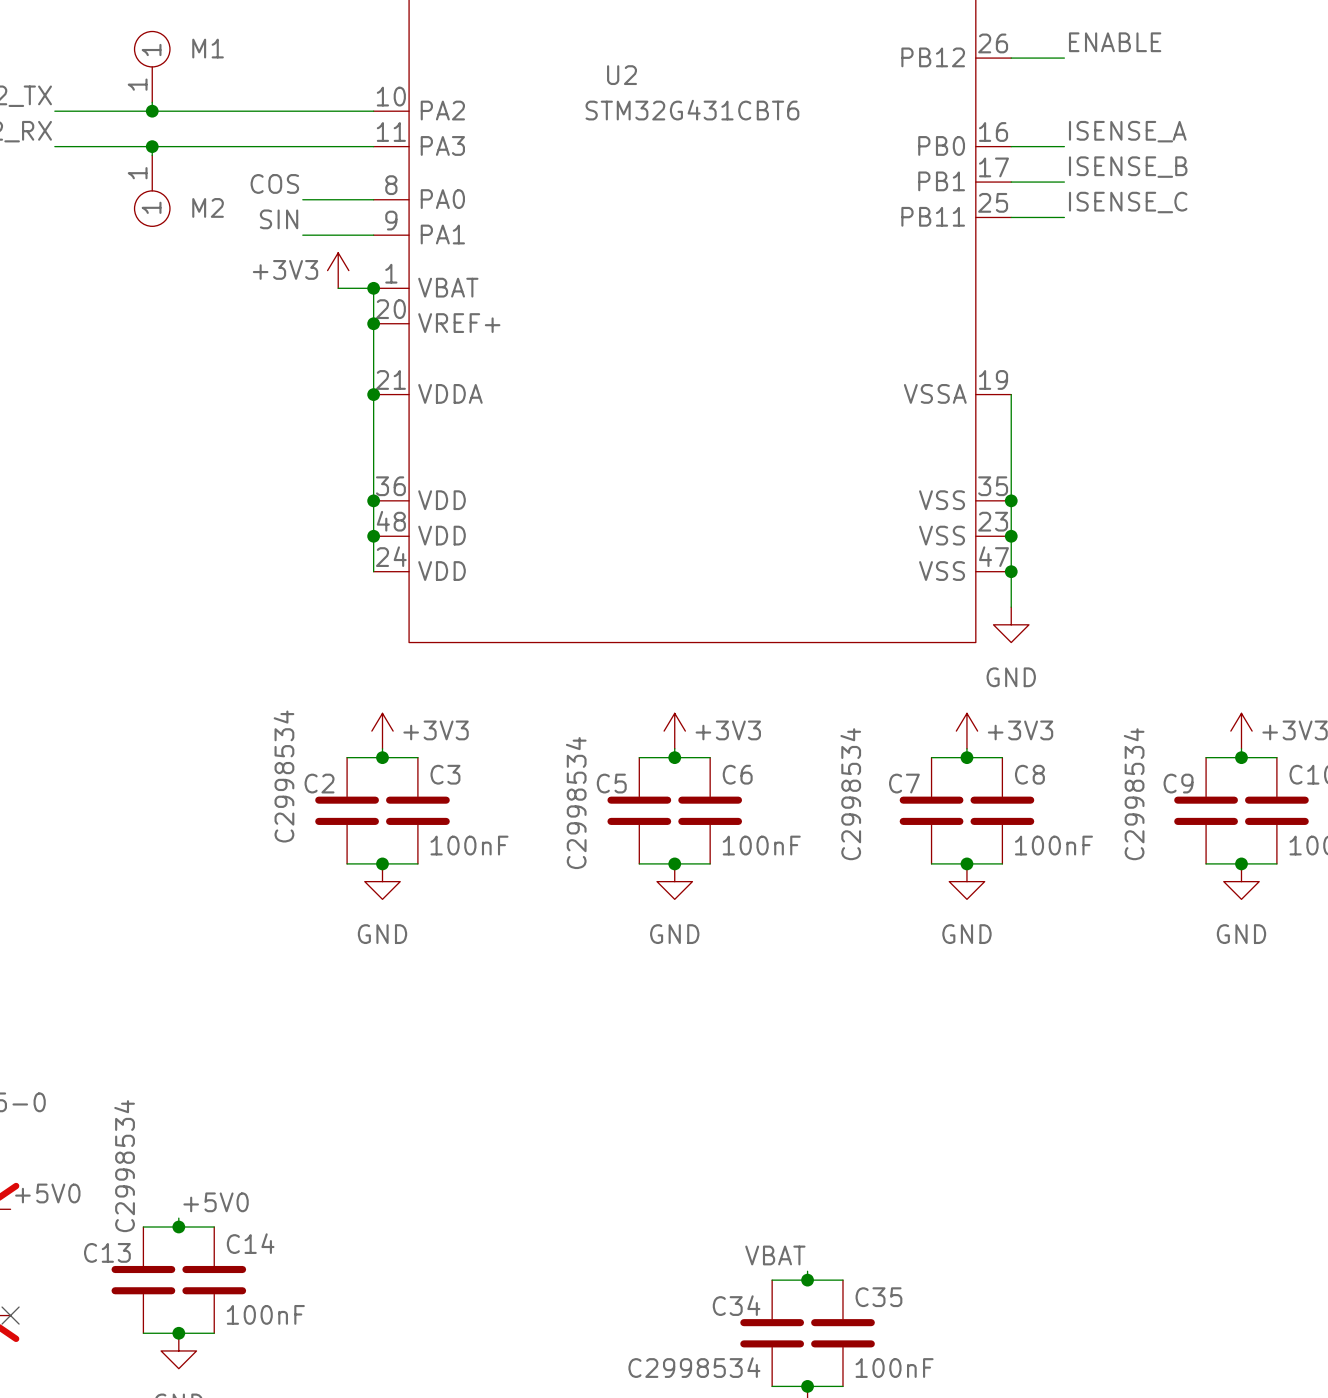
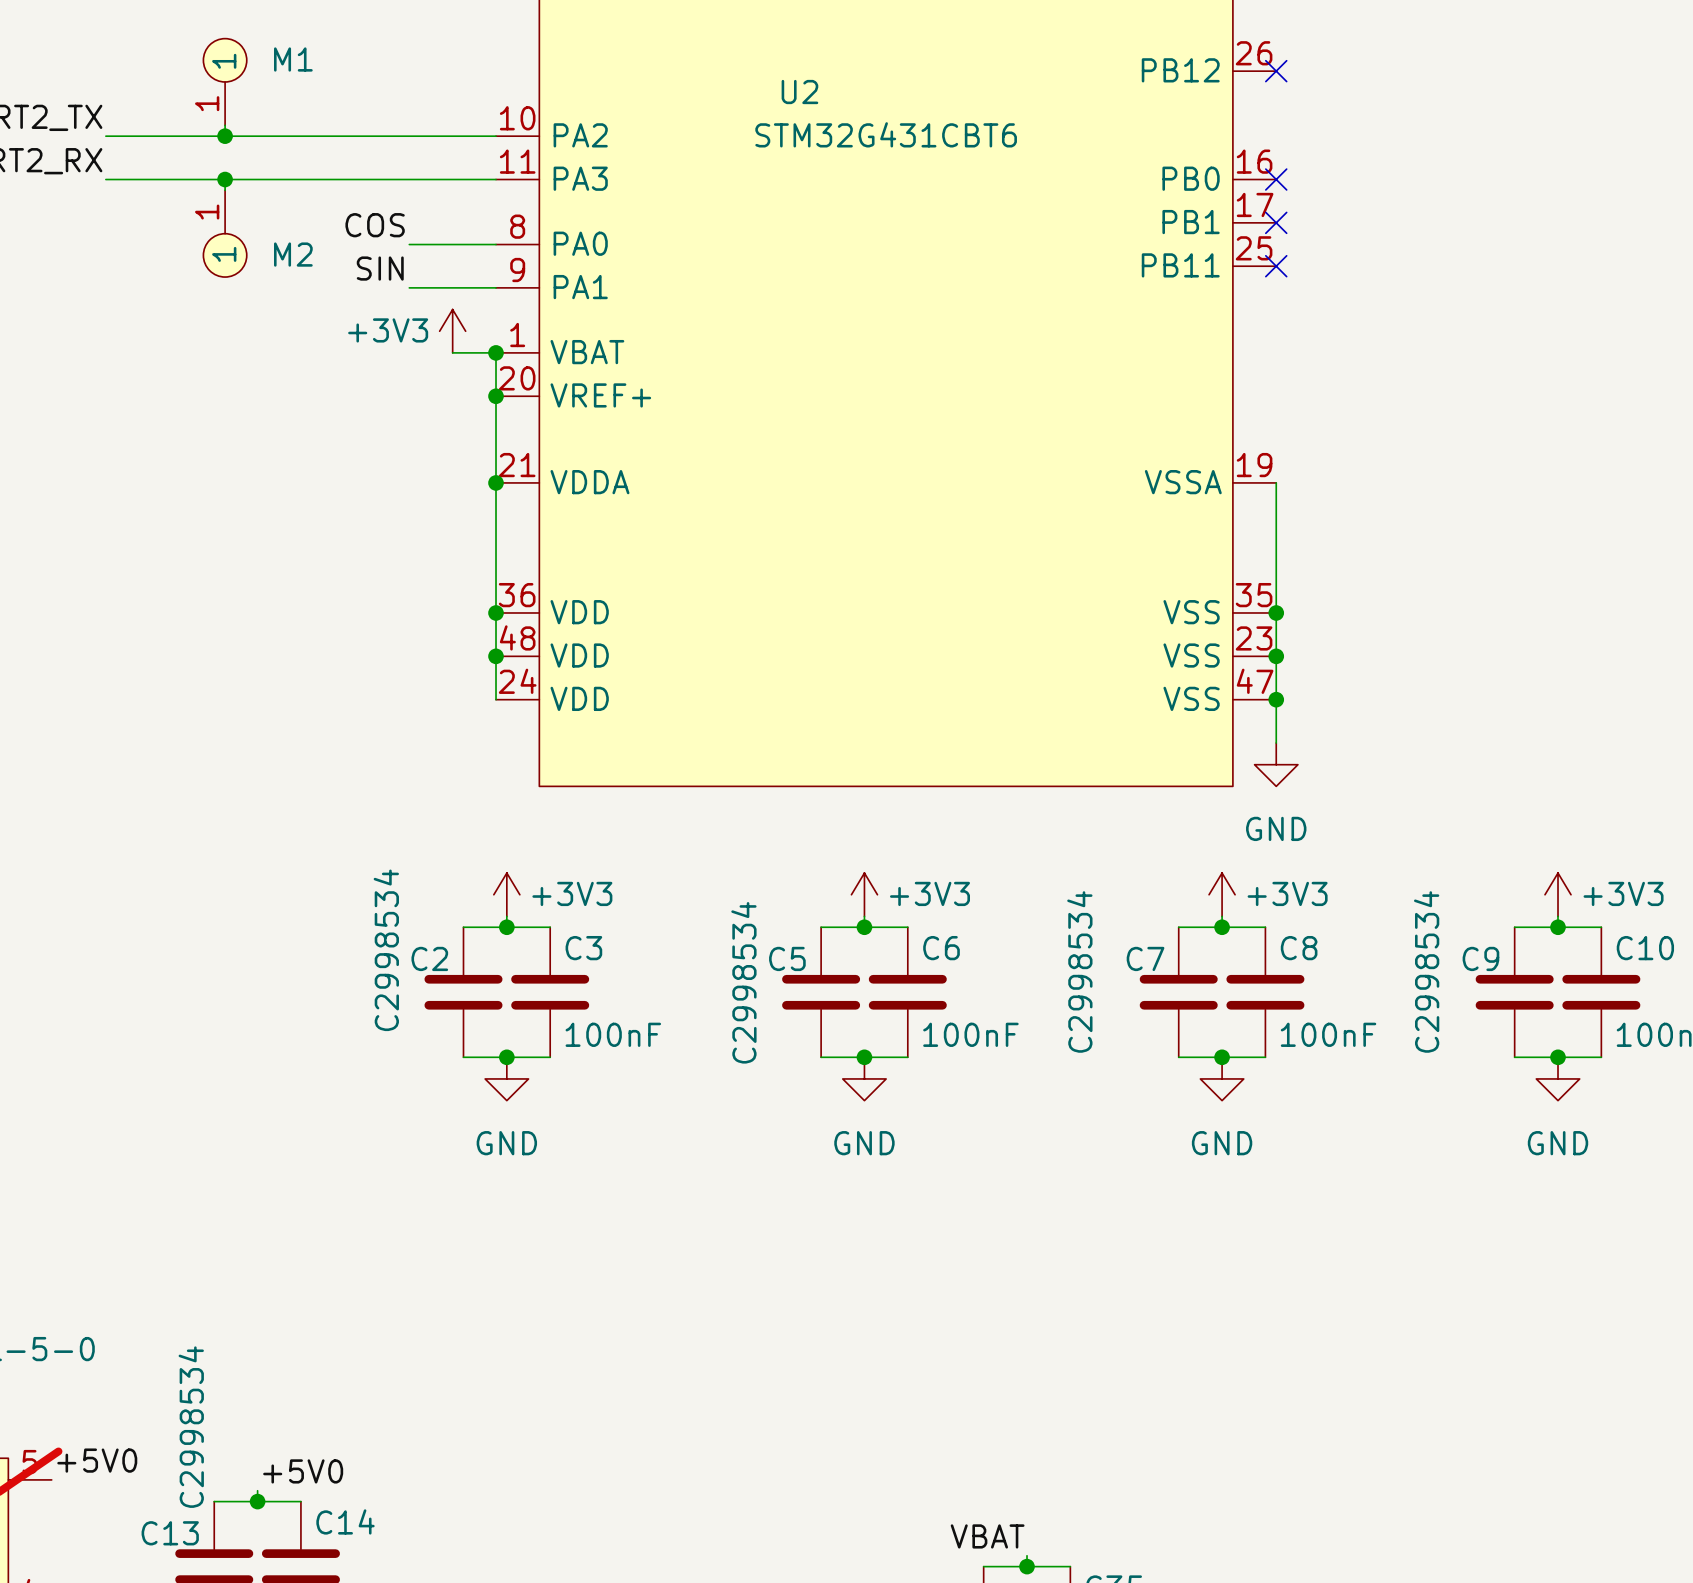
label: ENABLE (1115, 42) -> none
wire: (1011, 58) (1064, 58) -> none
no-connect mark: none -> (1276, 71)
label: ISENSE_A (1127, 131) -> none
wire: (1011, 146) (1064, 146) -> none
no-connect mark: none -> (1276, 179)
label: ISENSE_B (1128, 167) -> none
wire: (1011, 182) (1064, 182) -> none
no-connect mark: none -> (1276, 222)
label: ISENSE_C (1128, 202) -> none
wire: (1011, 217) (1064, 217) -> none
no-connect mark: none -> (1276, 266)

